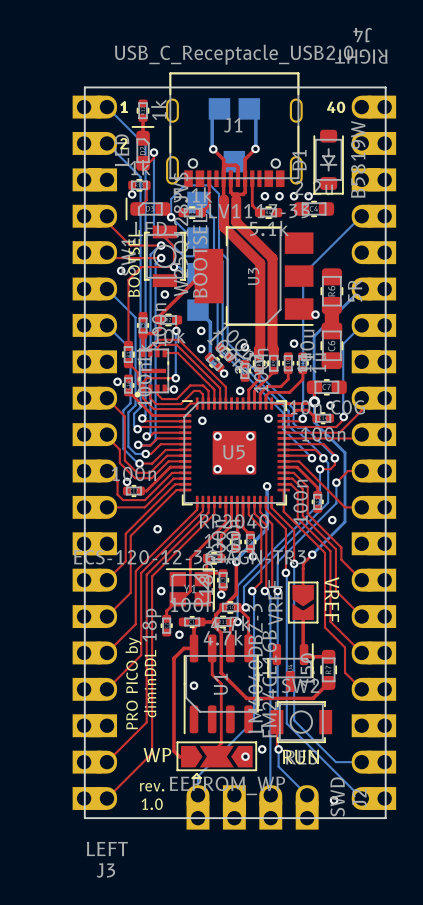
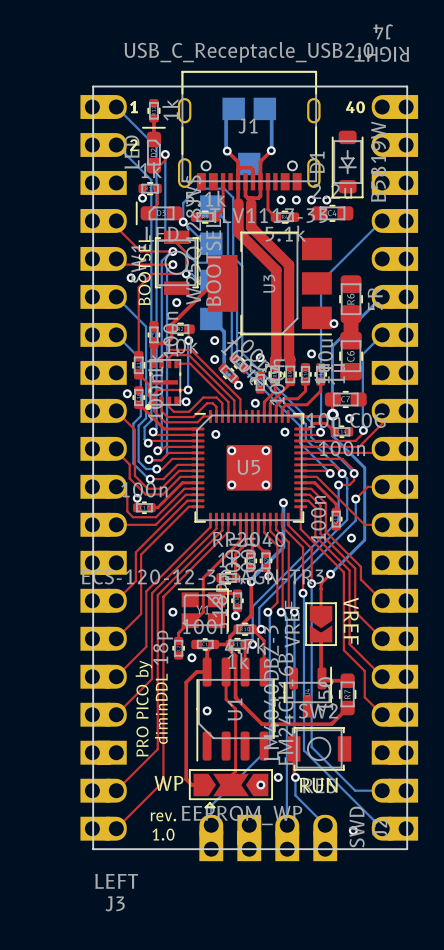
part value: 4.7k (223, 637) -> 1k (238, 660)

